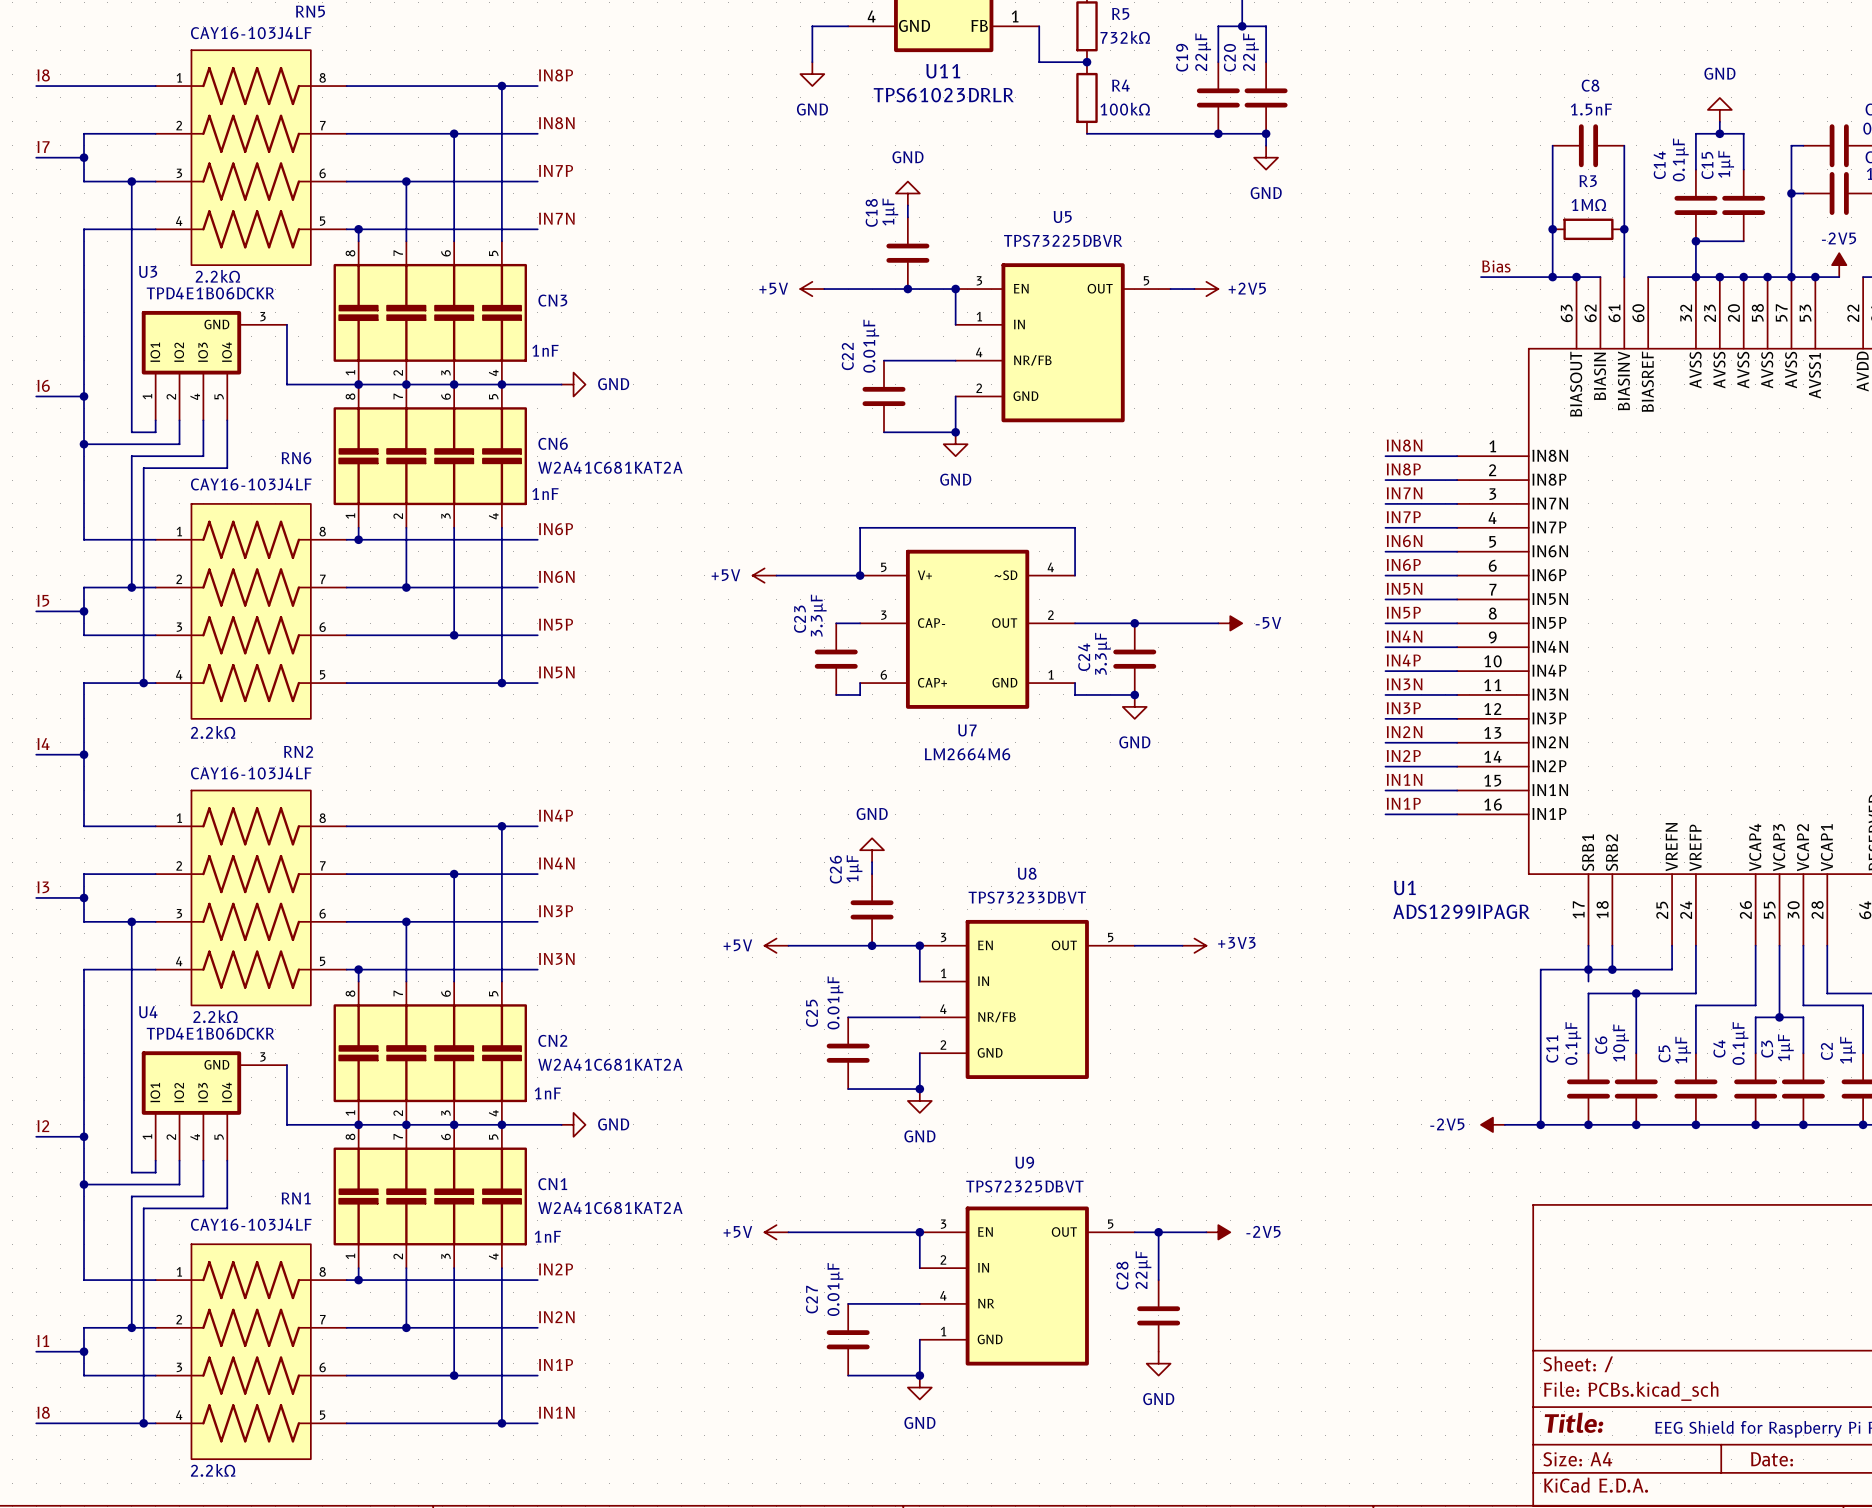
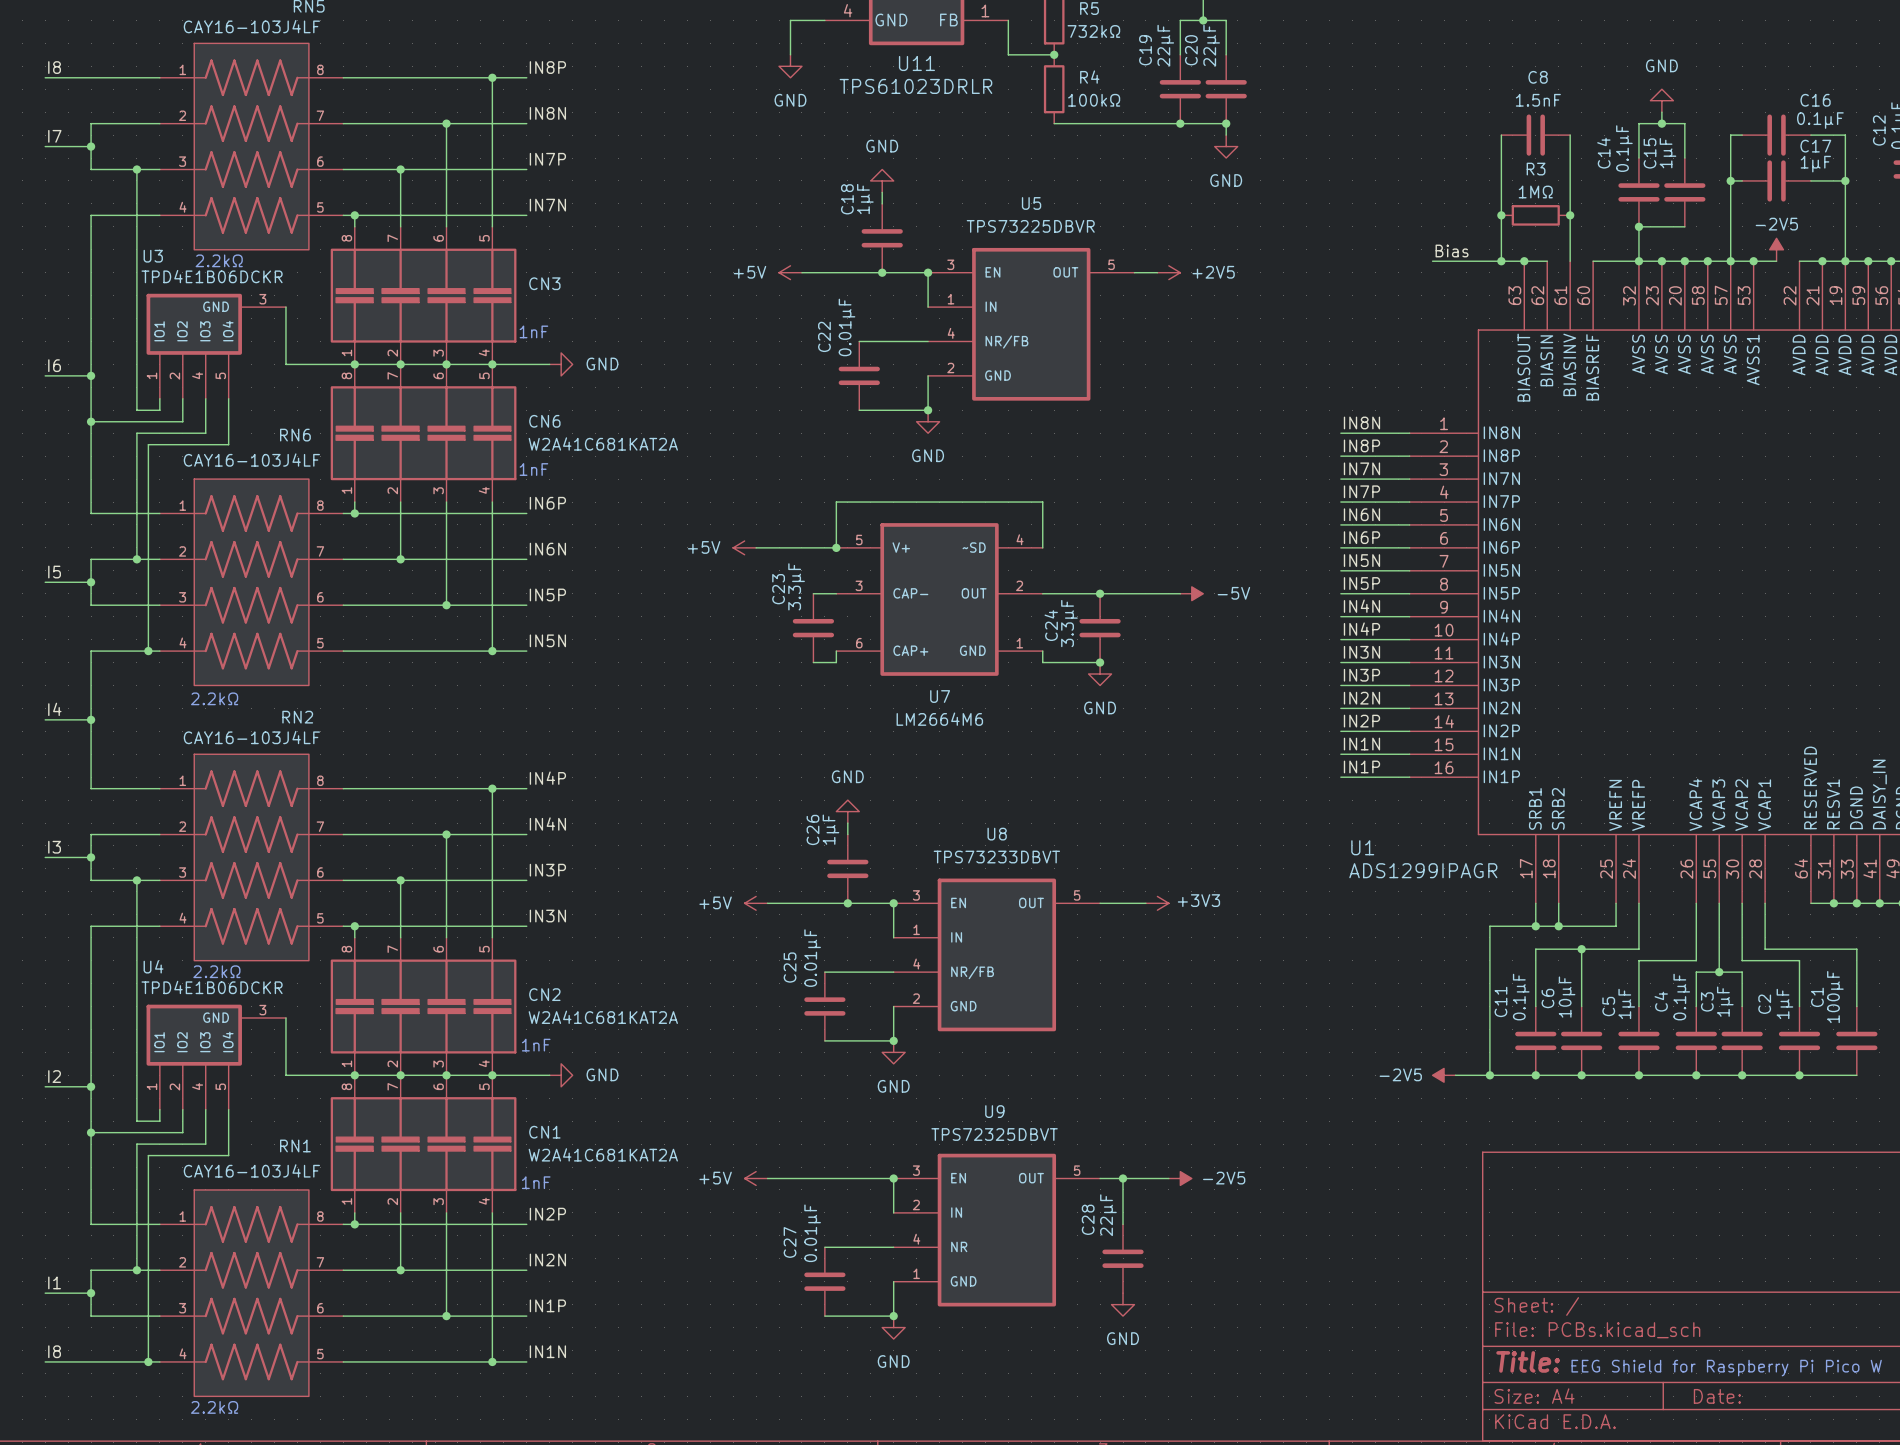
wire: (1588, 969) (1588, 981) -> none

